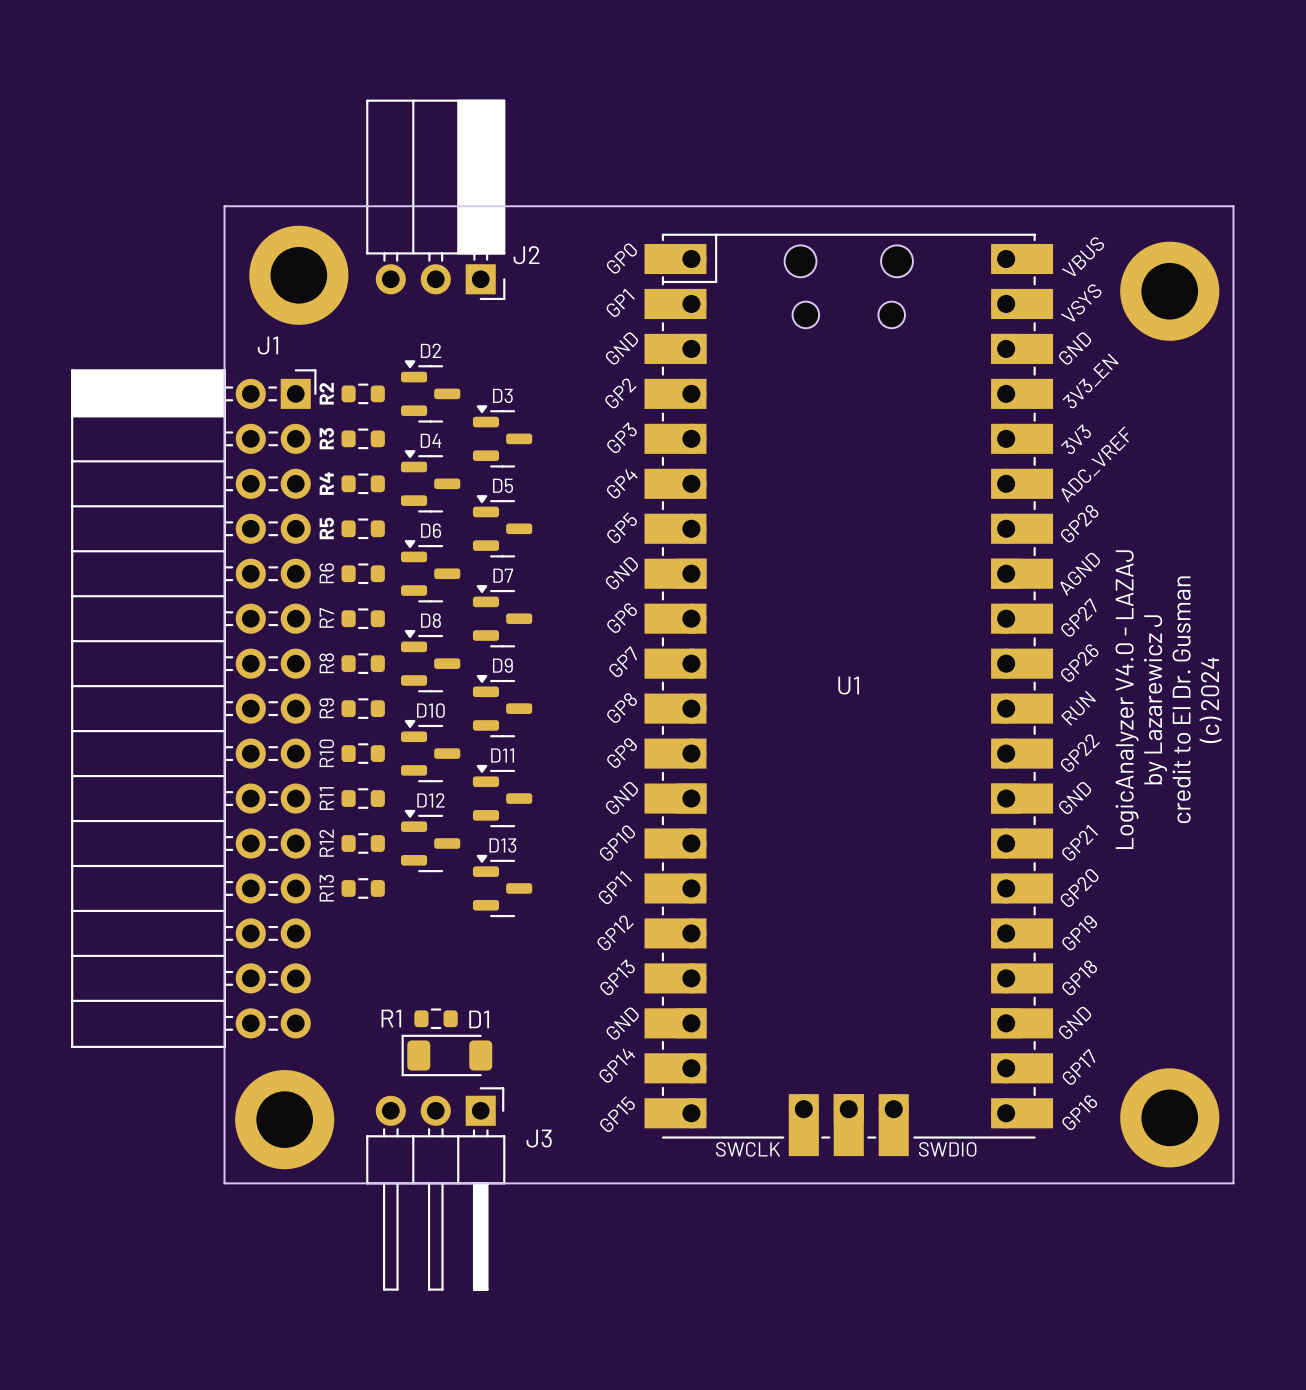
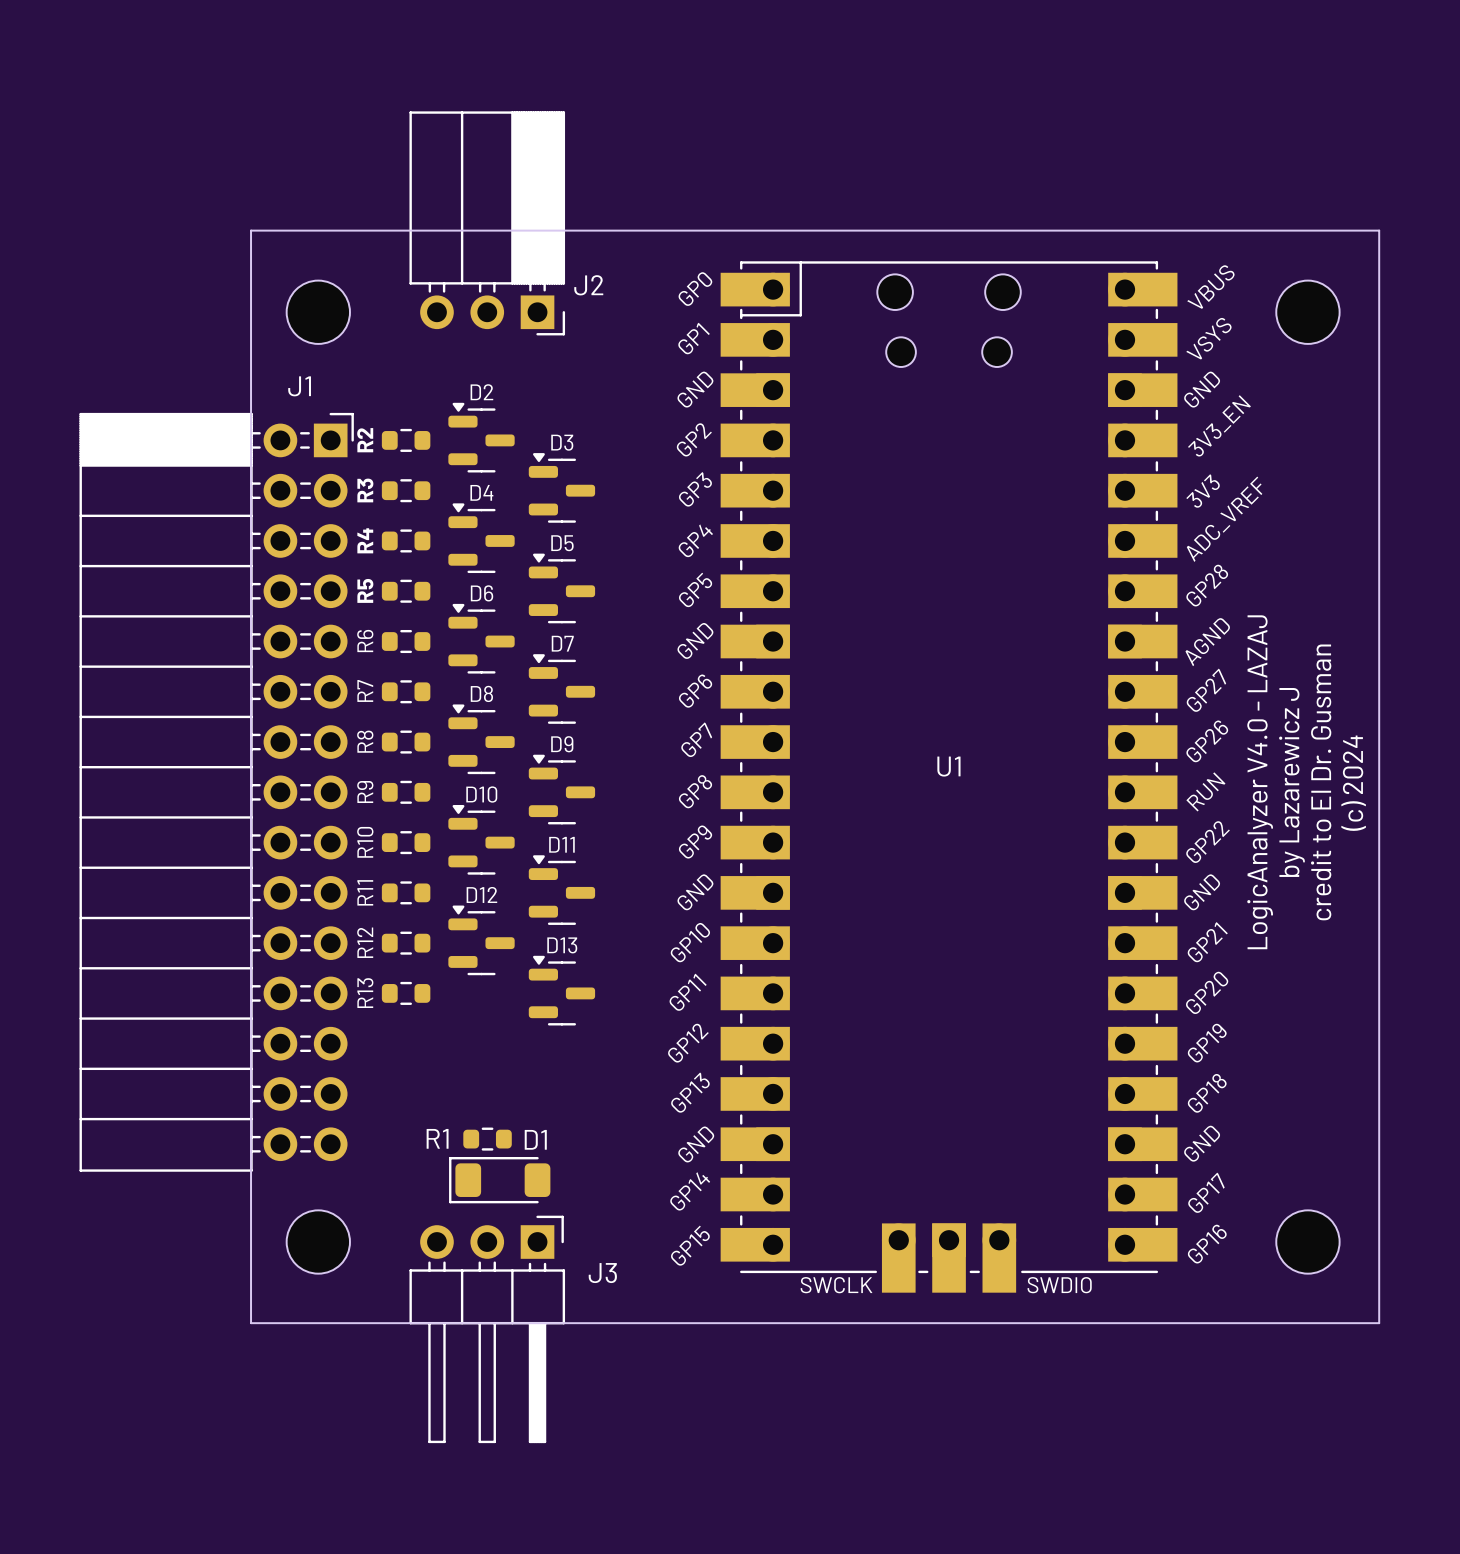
part footprint: [249, 225, 349, 325] -> [286, 280, 350, 344]
part footprint: [1120, 241, 1220, 341] -> [1276, 280, 1340, 344]
part footprint: [1120, 1068, 1220, 1168] -> [1276, 1210, 1340, 1274]
part footprint: [235, 1070, 335, 1170] -> [286, 1210, 350, 1274]

